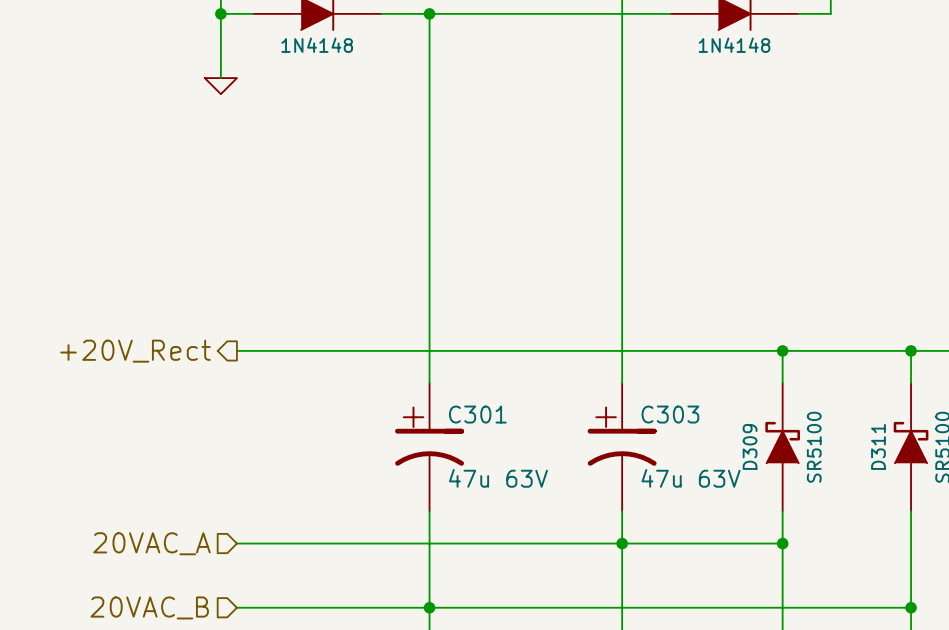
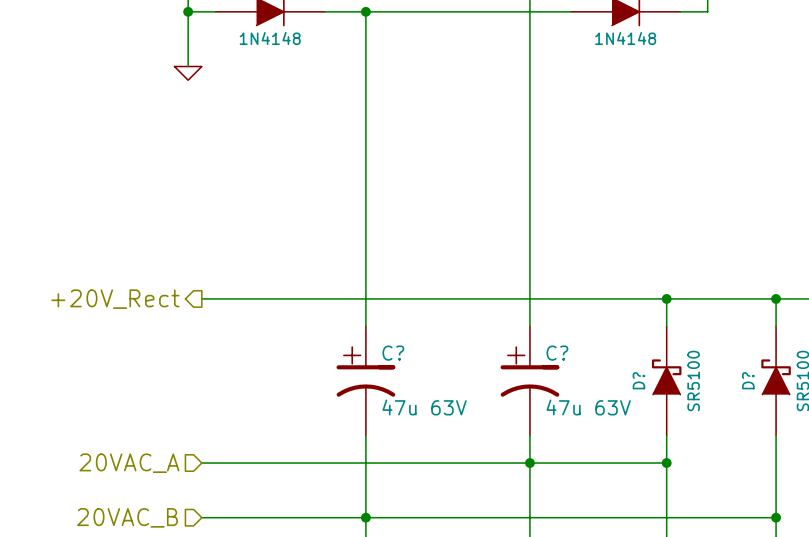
C301 name: C301 (477, 414) -> C? (393, 353)
C303 name: C303 (670, 414) -> C? (557, 353)
D309 name: D309 (750, 446) -> D? (638, 380)
D311 name: D311 (878, 446) -> D? (748, 380)

